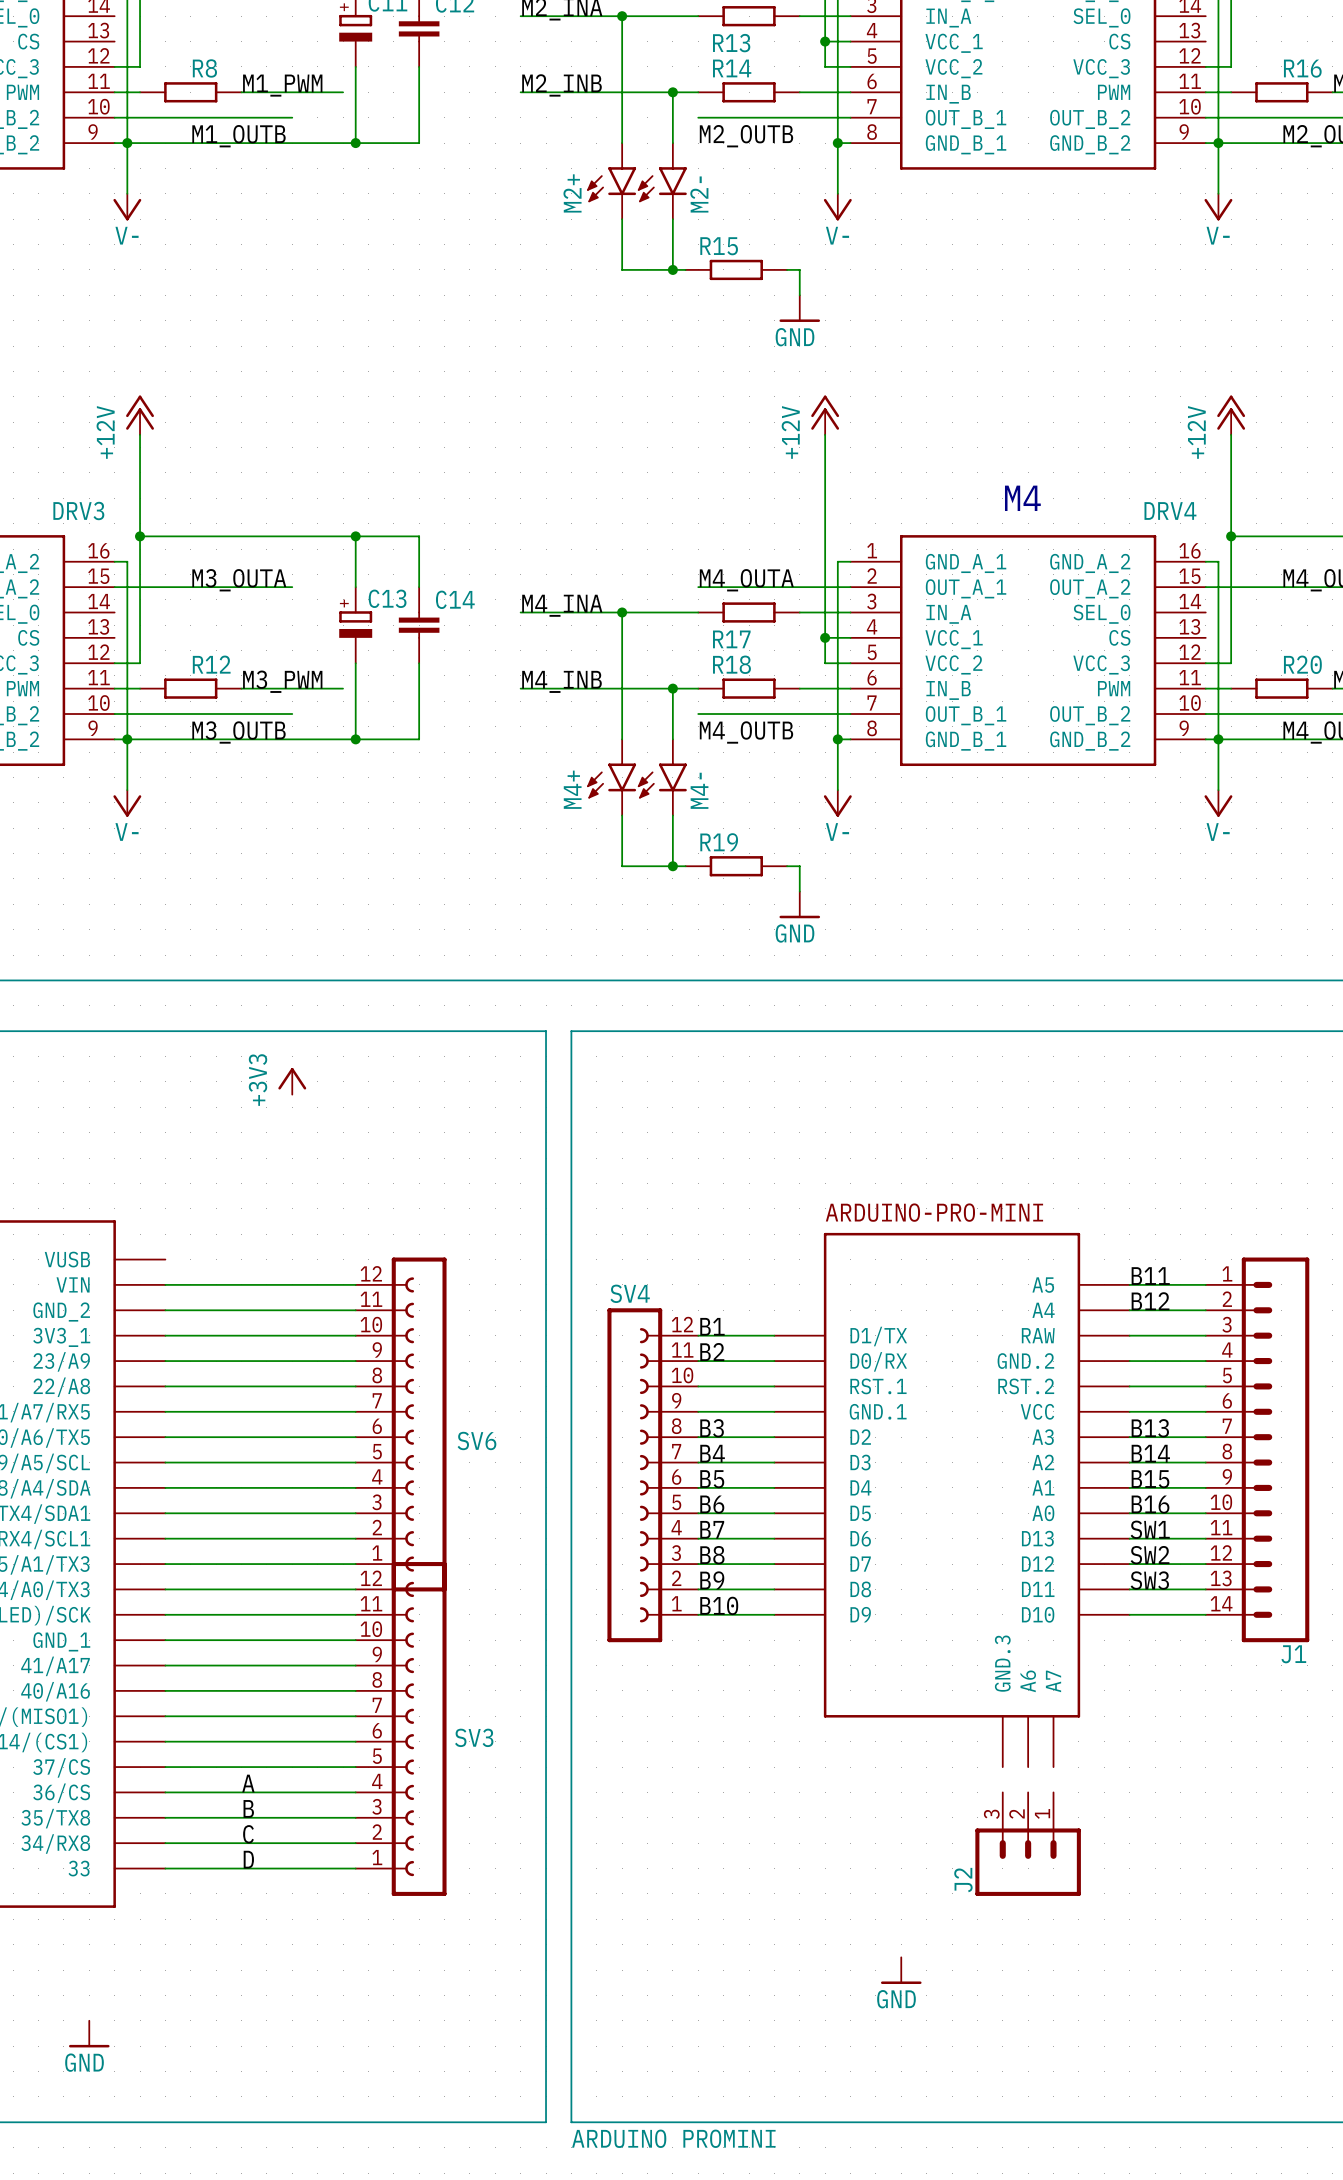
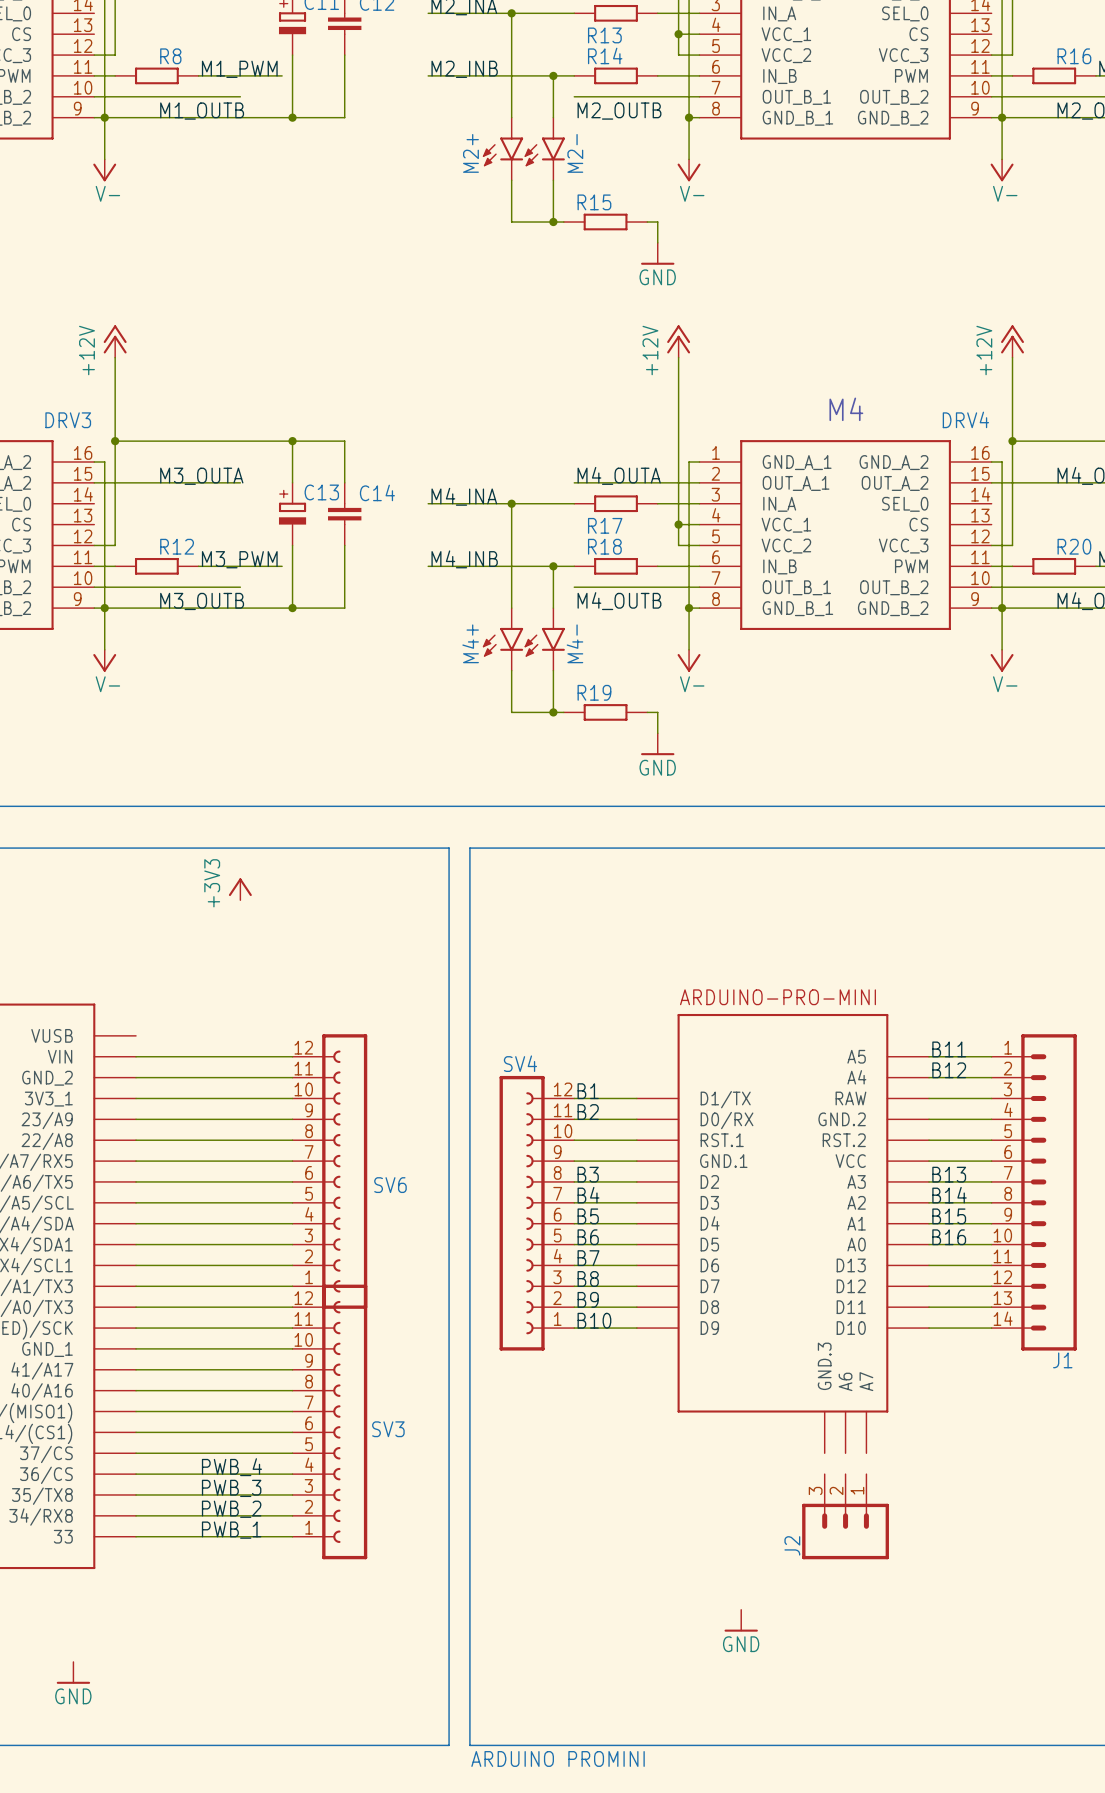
label: SW1 (1150, 1529) -> none
label: SW2 (1150, 1555) -> none
label: SW3 (1149, 1580) -> none
label: A (248, 1783) -> PWB_4 (231, 1467)
label: B (248, 1808) -> PWB_3 (231, 1488)
label: C (248, 1834) -> PWB_2 (231, 1509)
label: D (248, 1859) -> PWB_1 (231, 1530)

